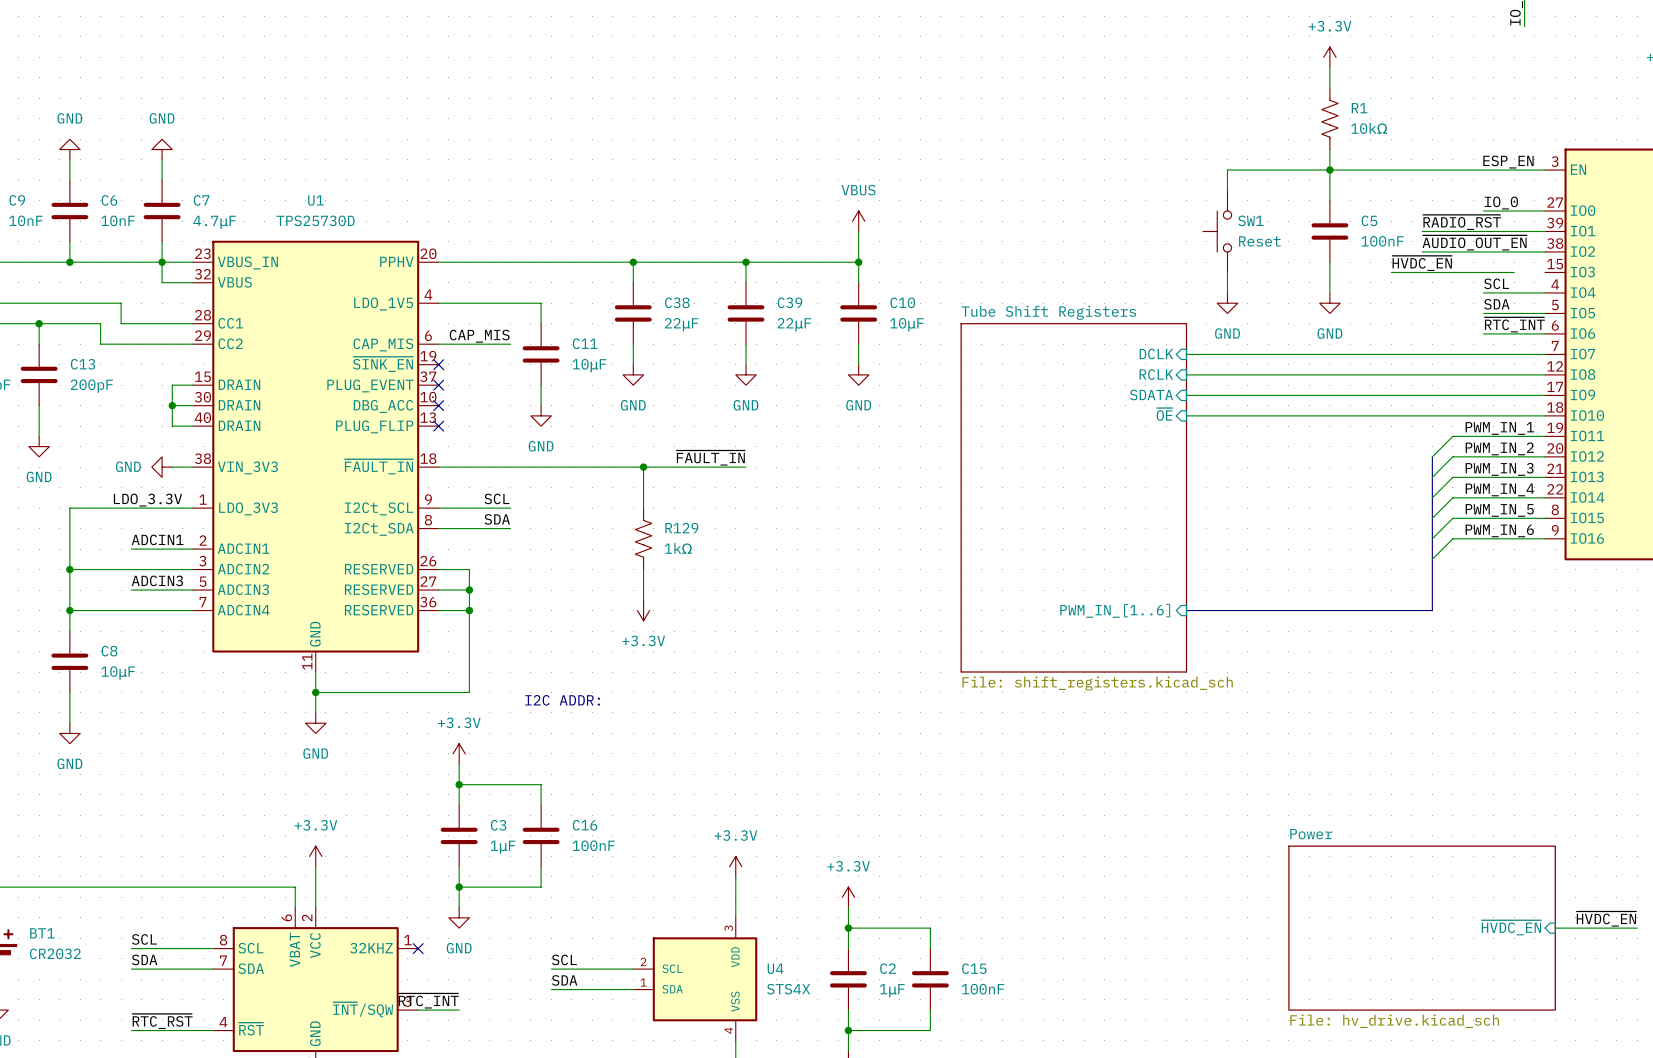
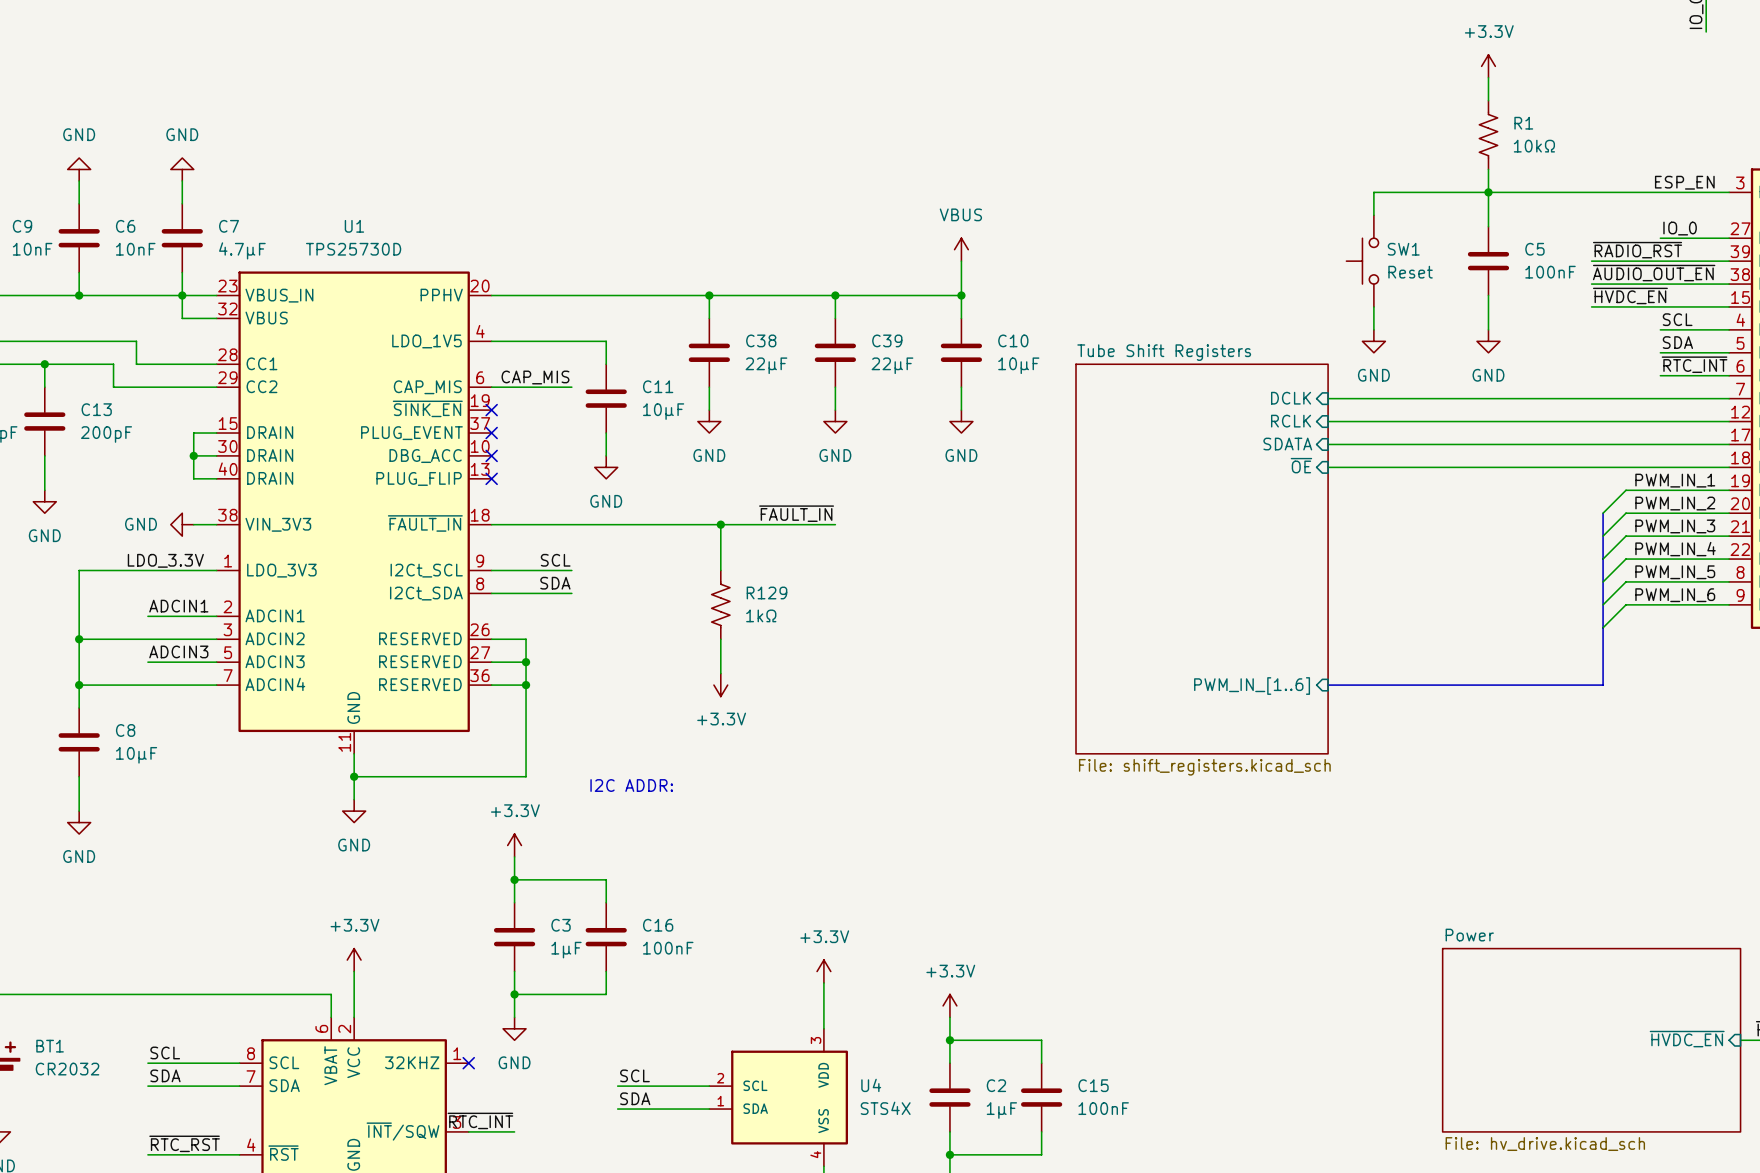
label position: ~{HVDC_EN} (1422, 263) -> ~{HVDC_EN} (1630, 295)
wire: (1391, 272) (1422, 272) -> (1694, 306) (1729, 306)

